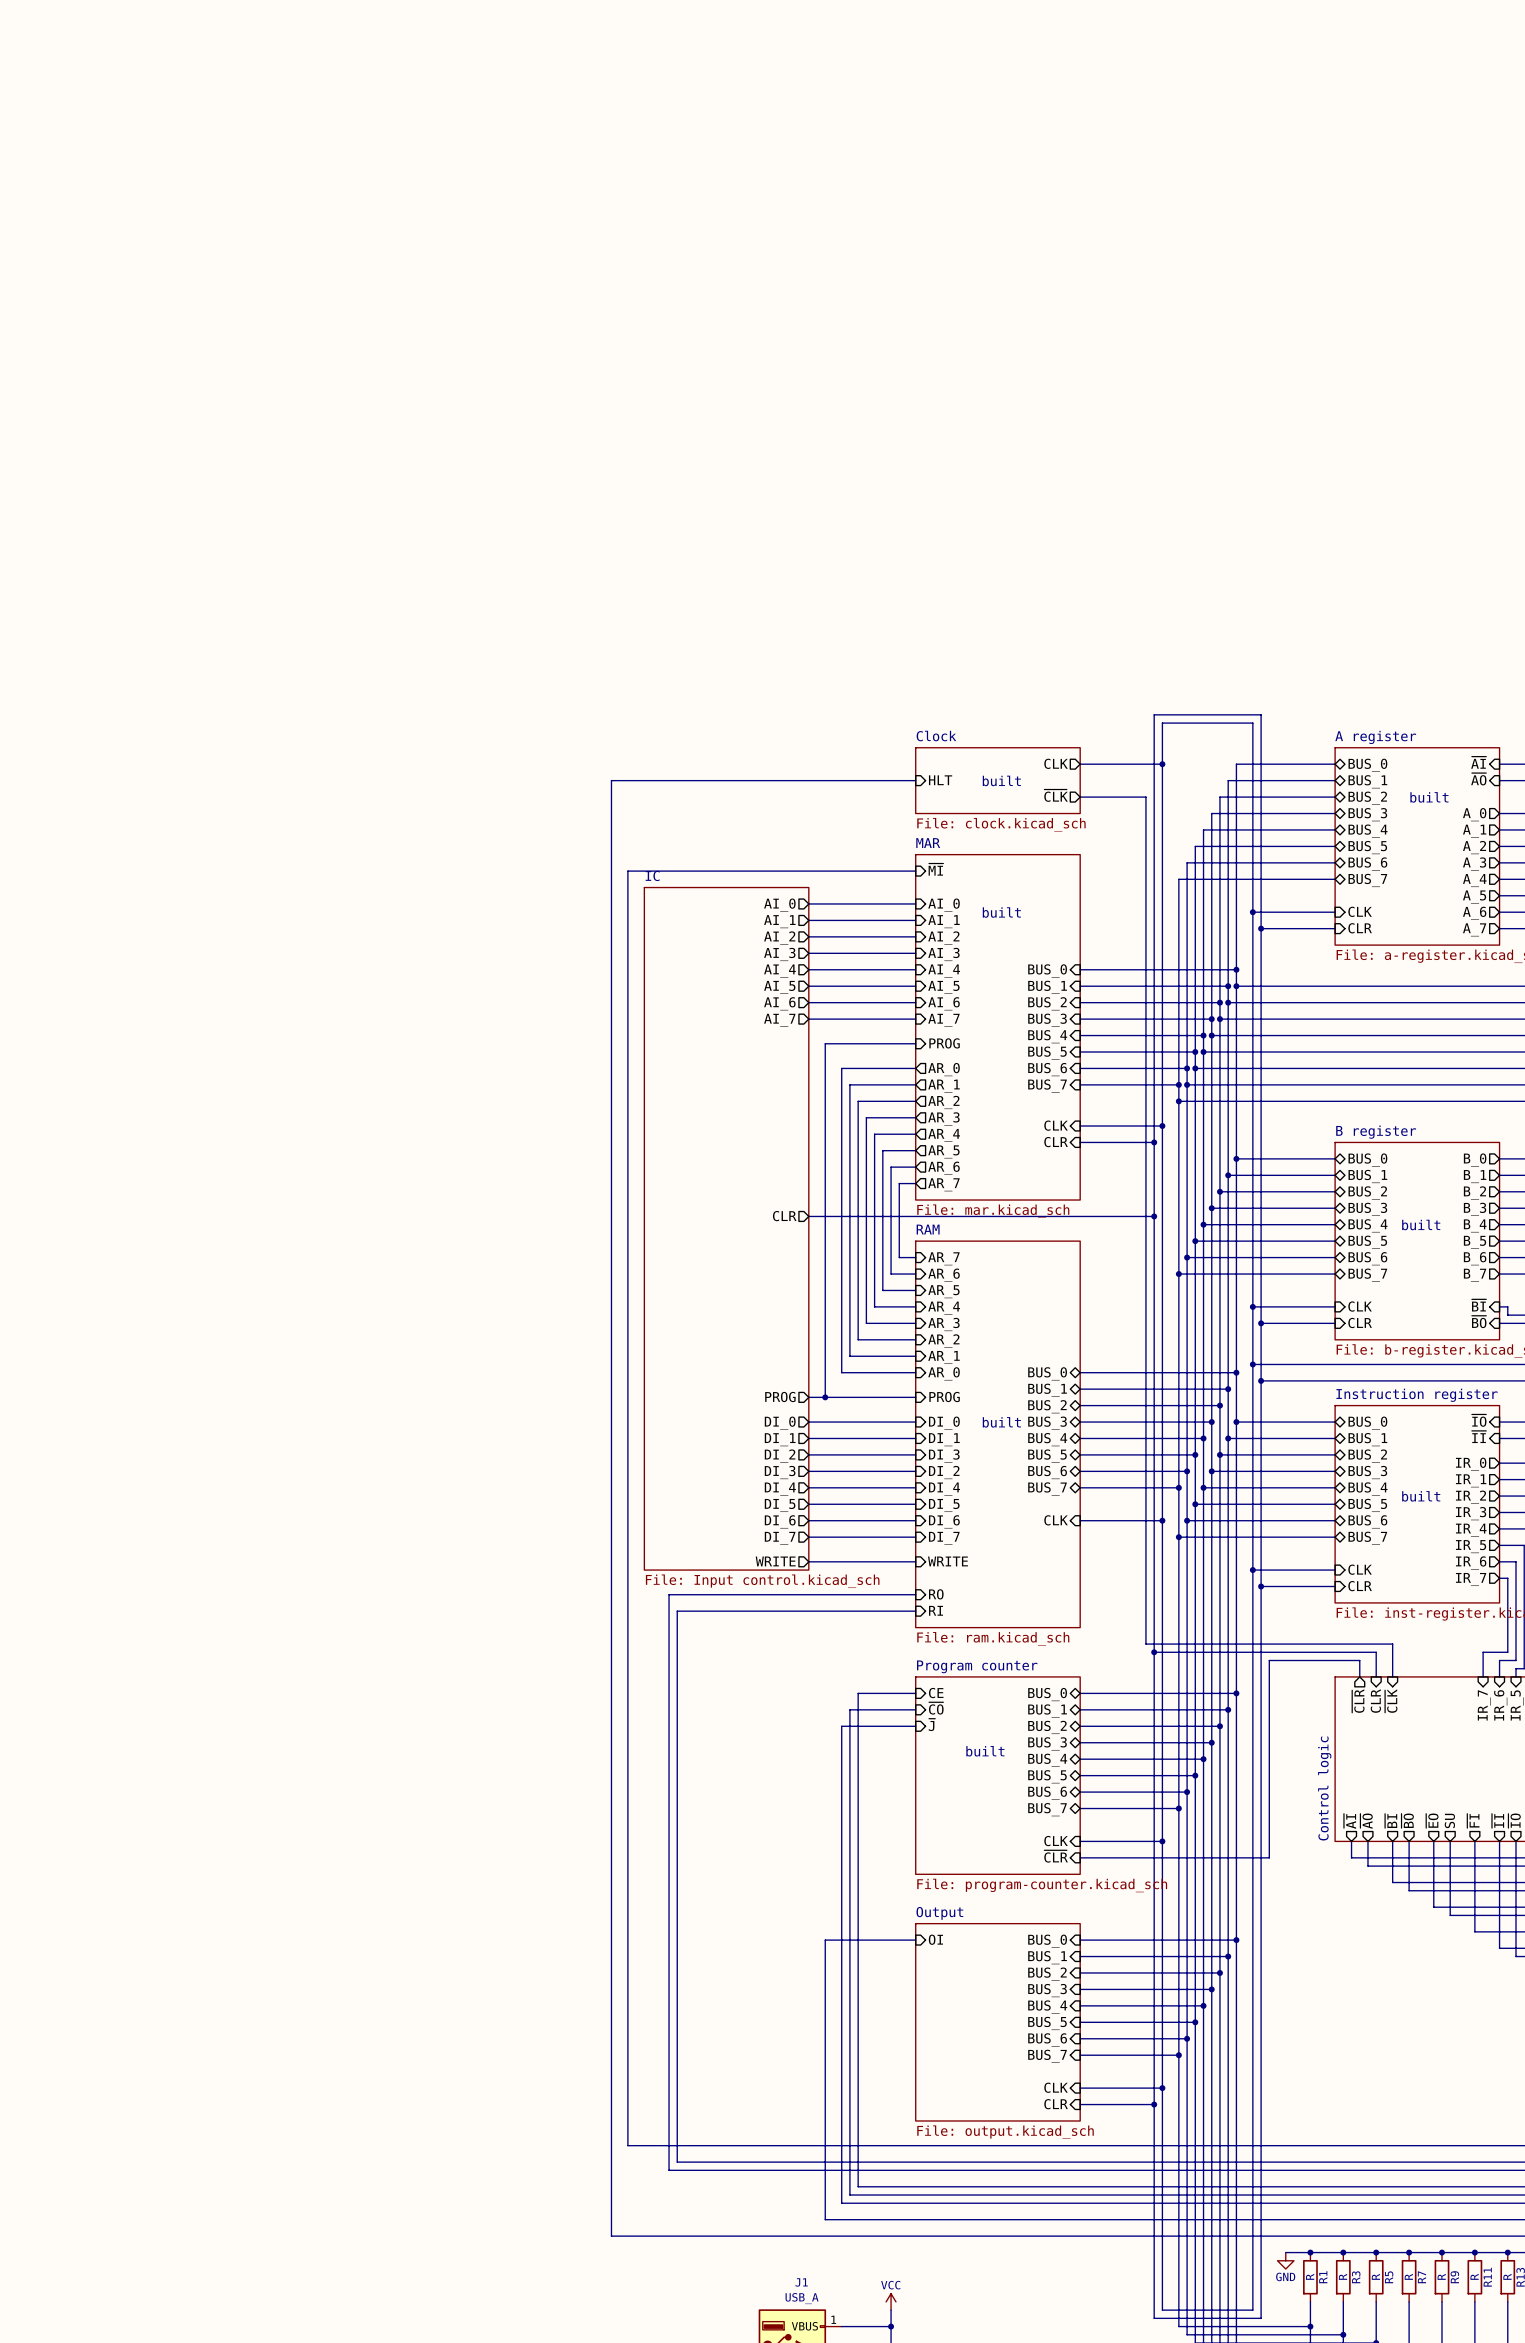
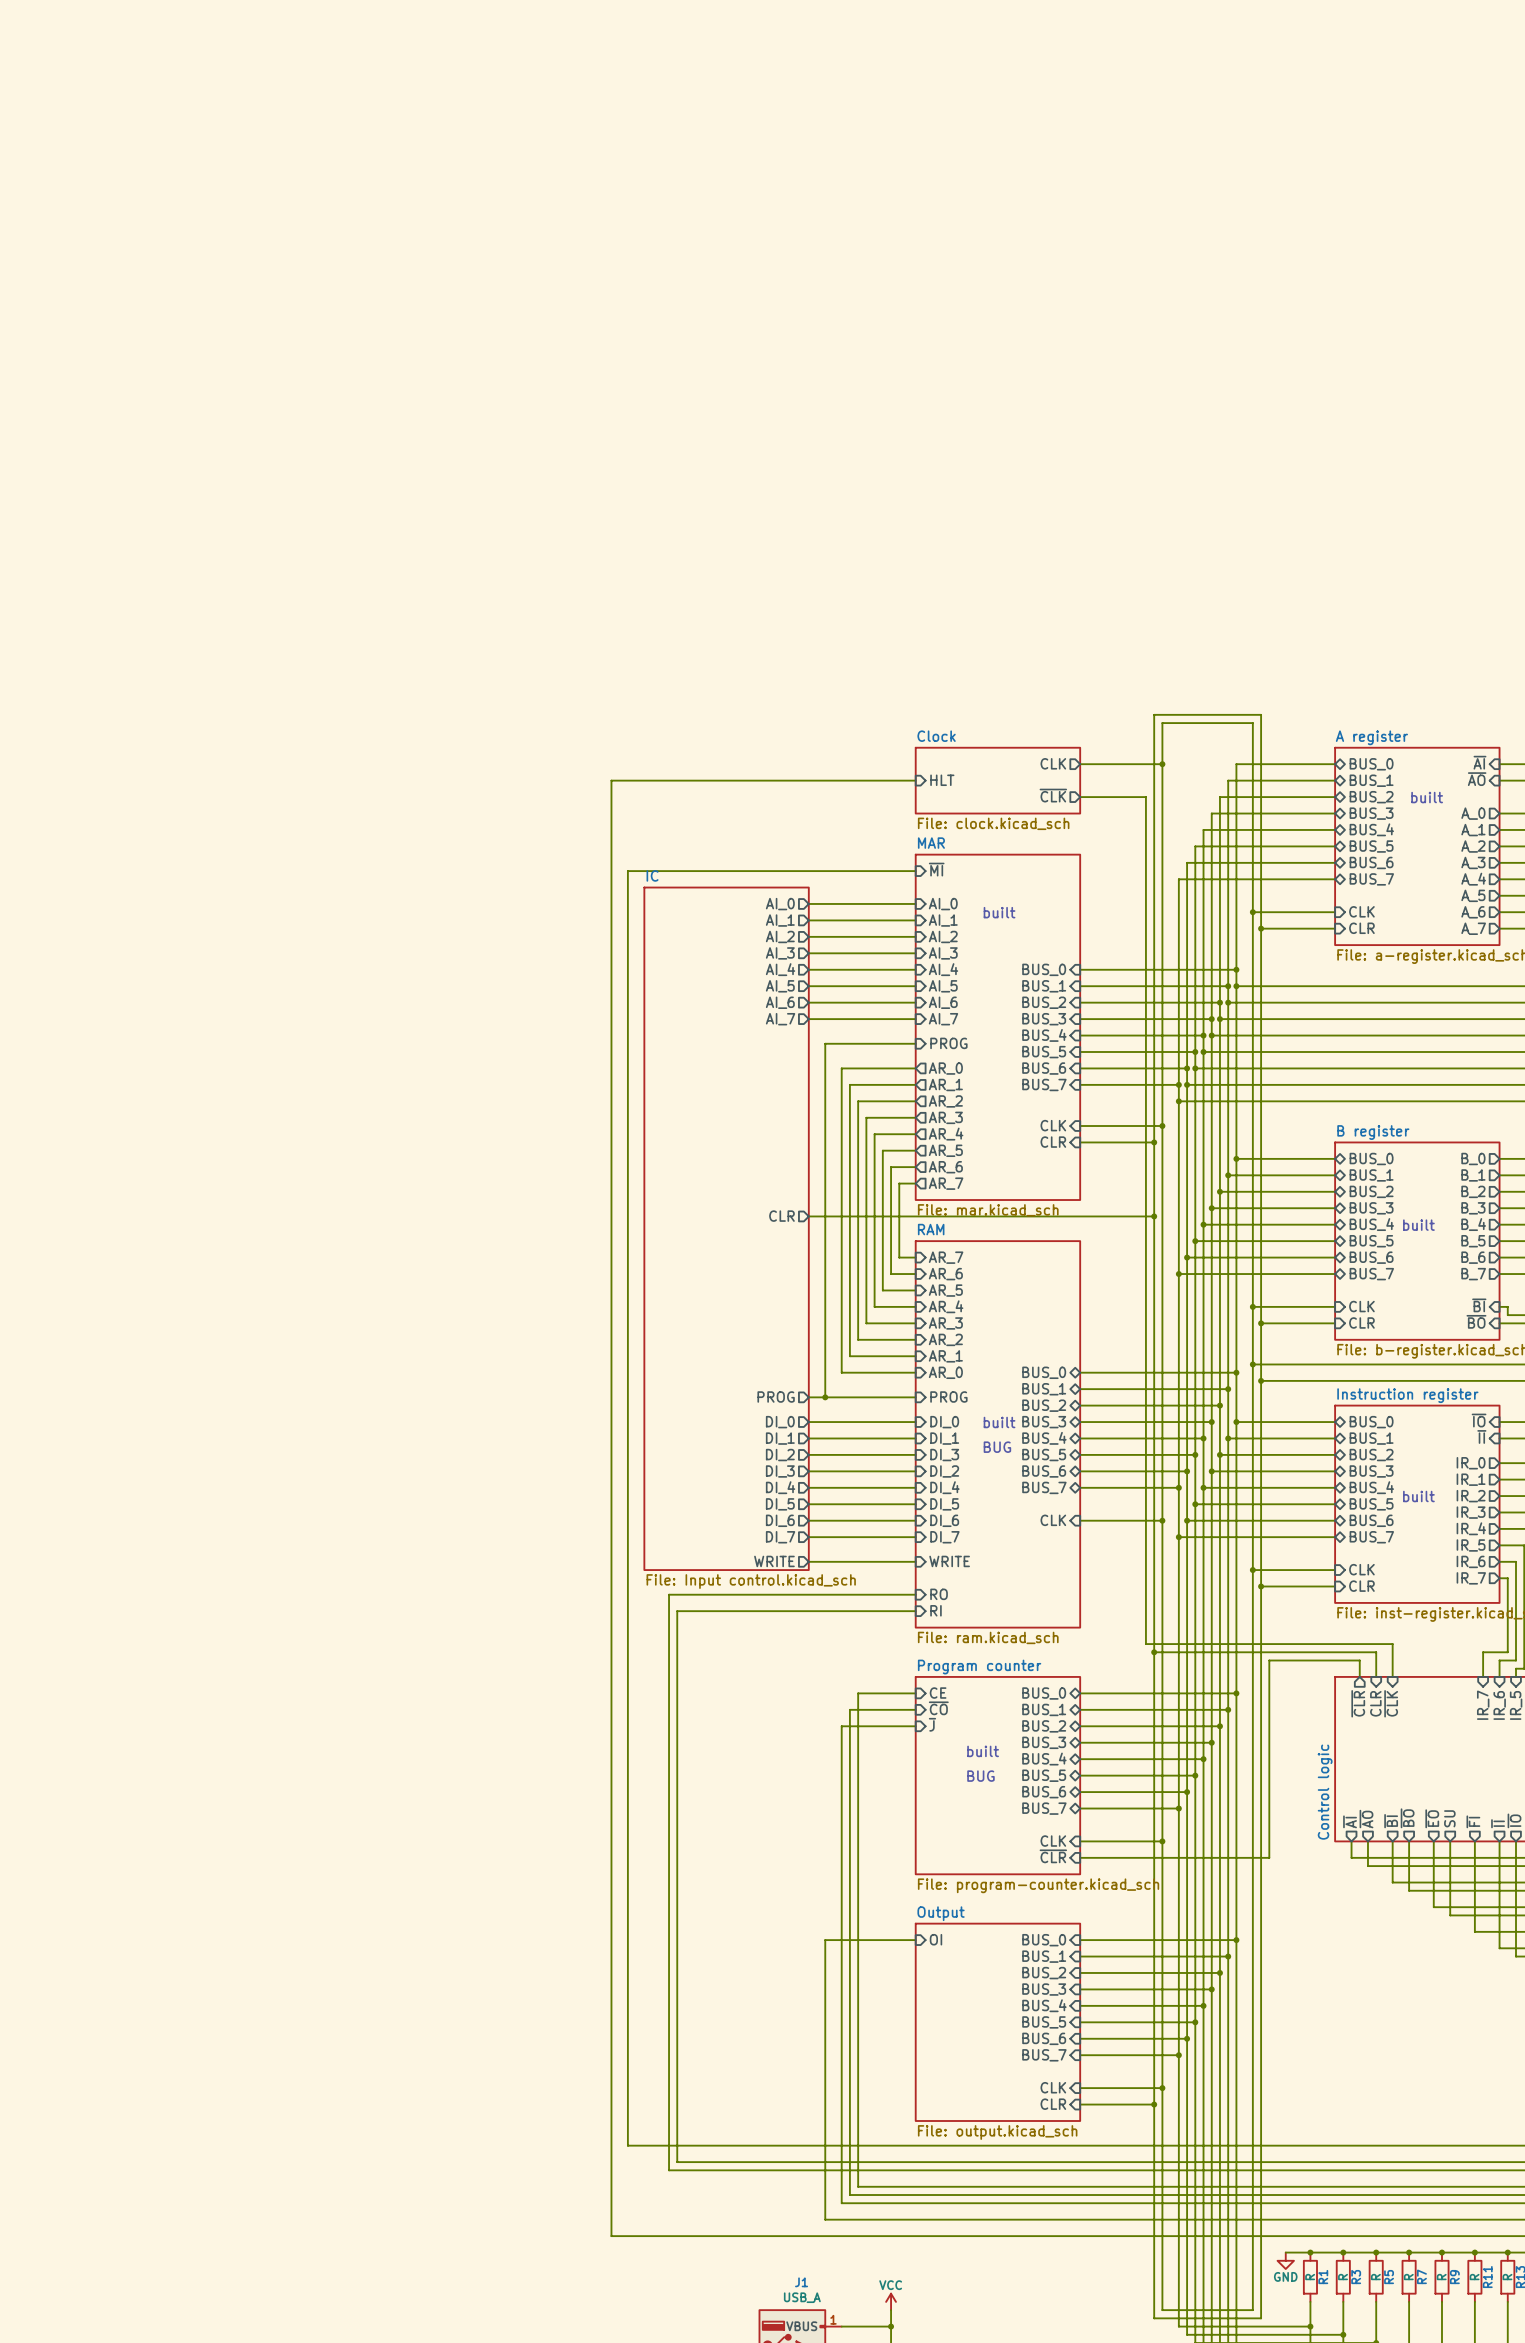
text: built (1001, 780) -> none
text: none -> BUG (997, 1447)
text: none -> BUG (980, 1776)

